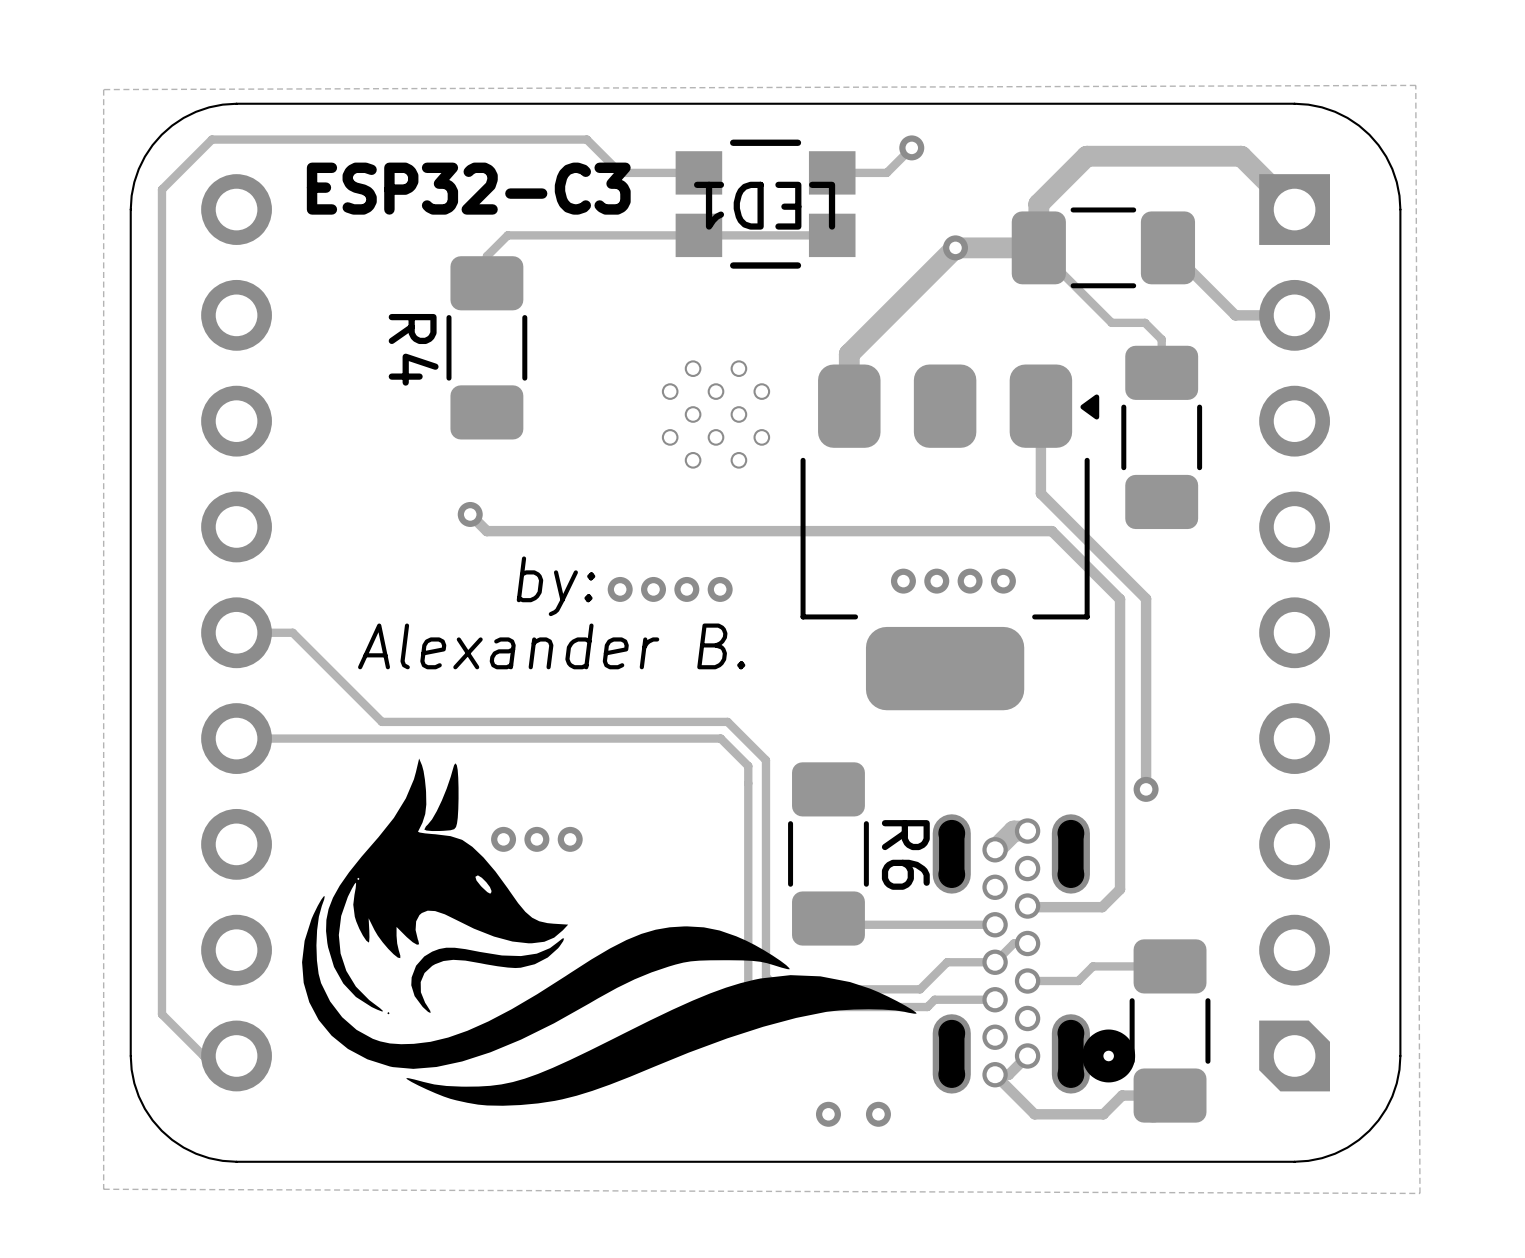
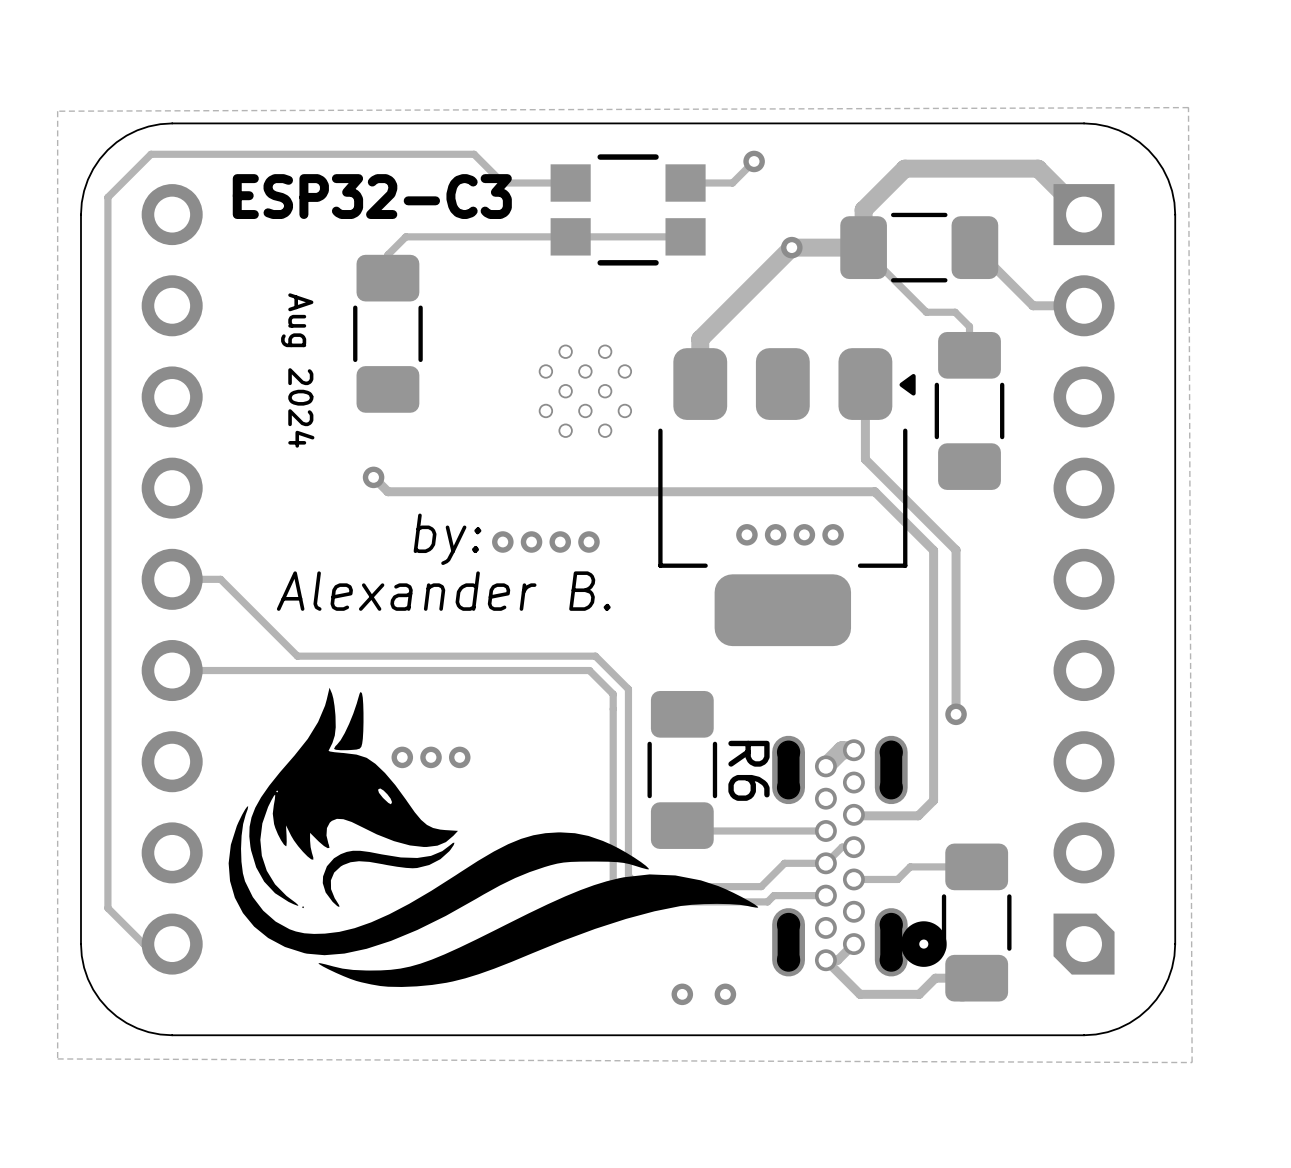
LED1 name: LED1 (764, 205) -> none
R4 name: R4 (413, 349) -> none
text: none -> Aug 2024 (297, 370)

